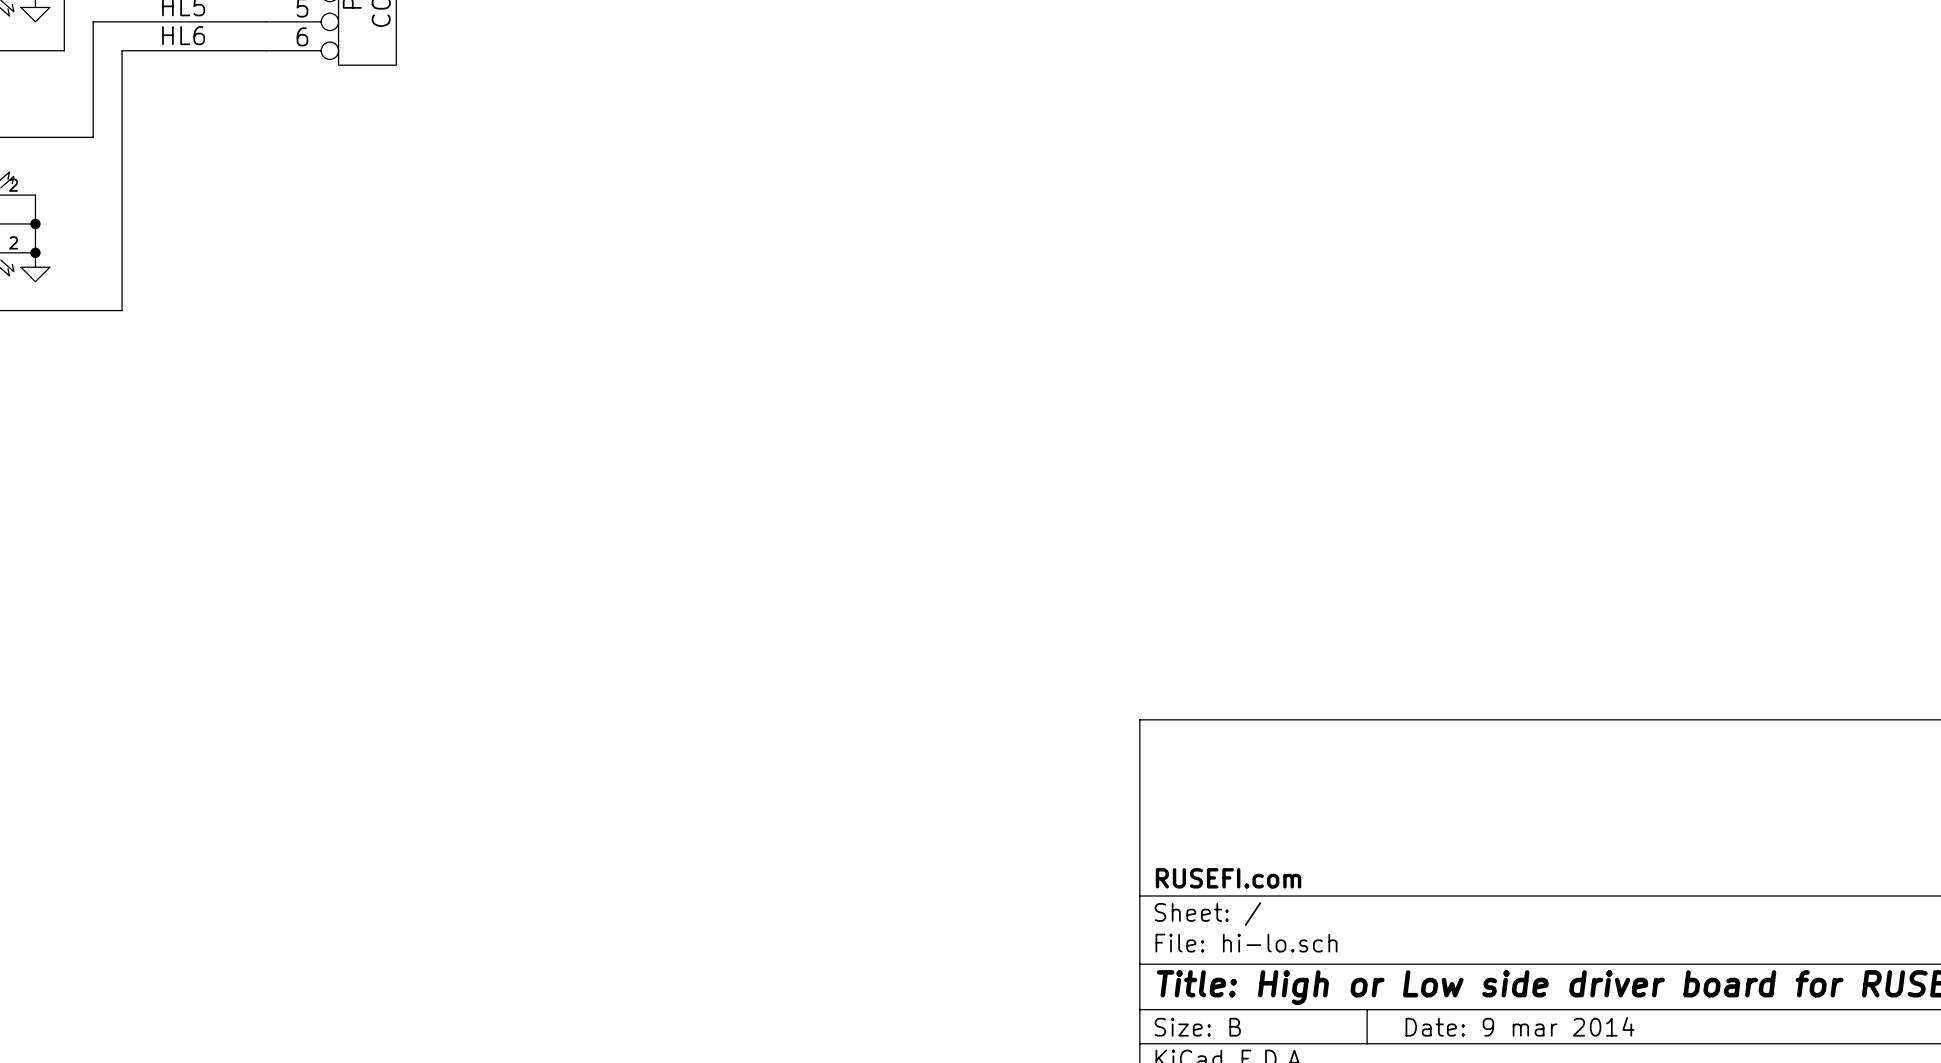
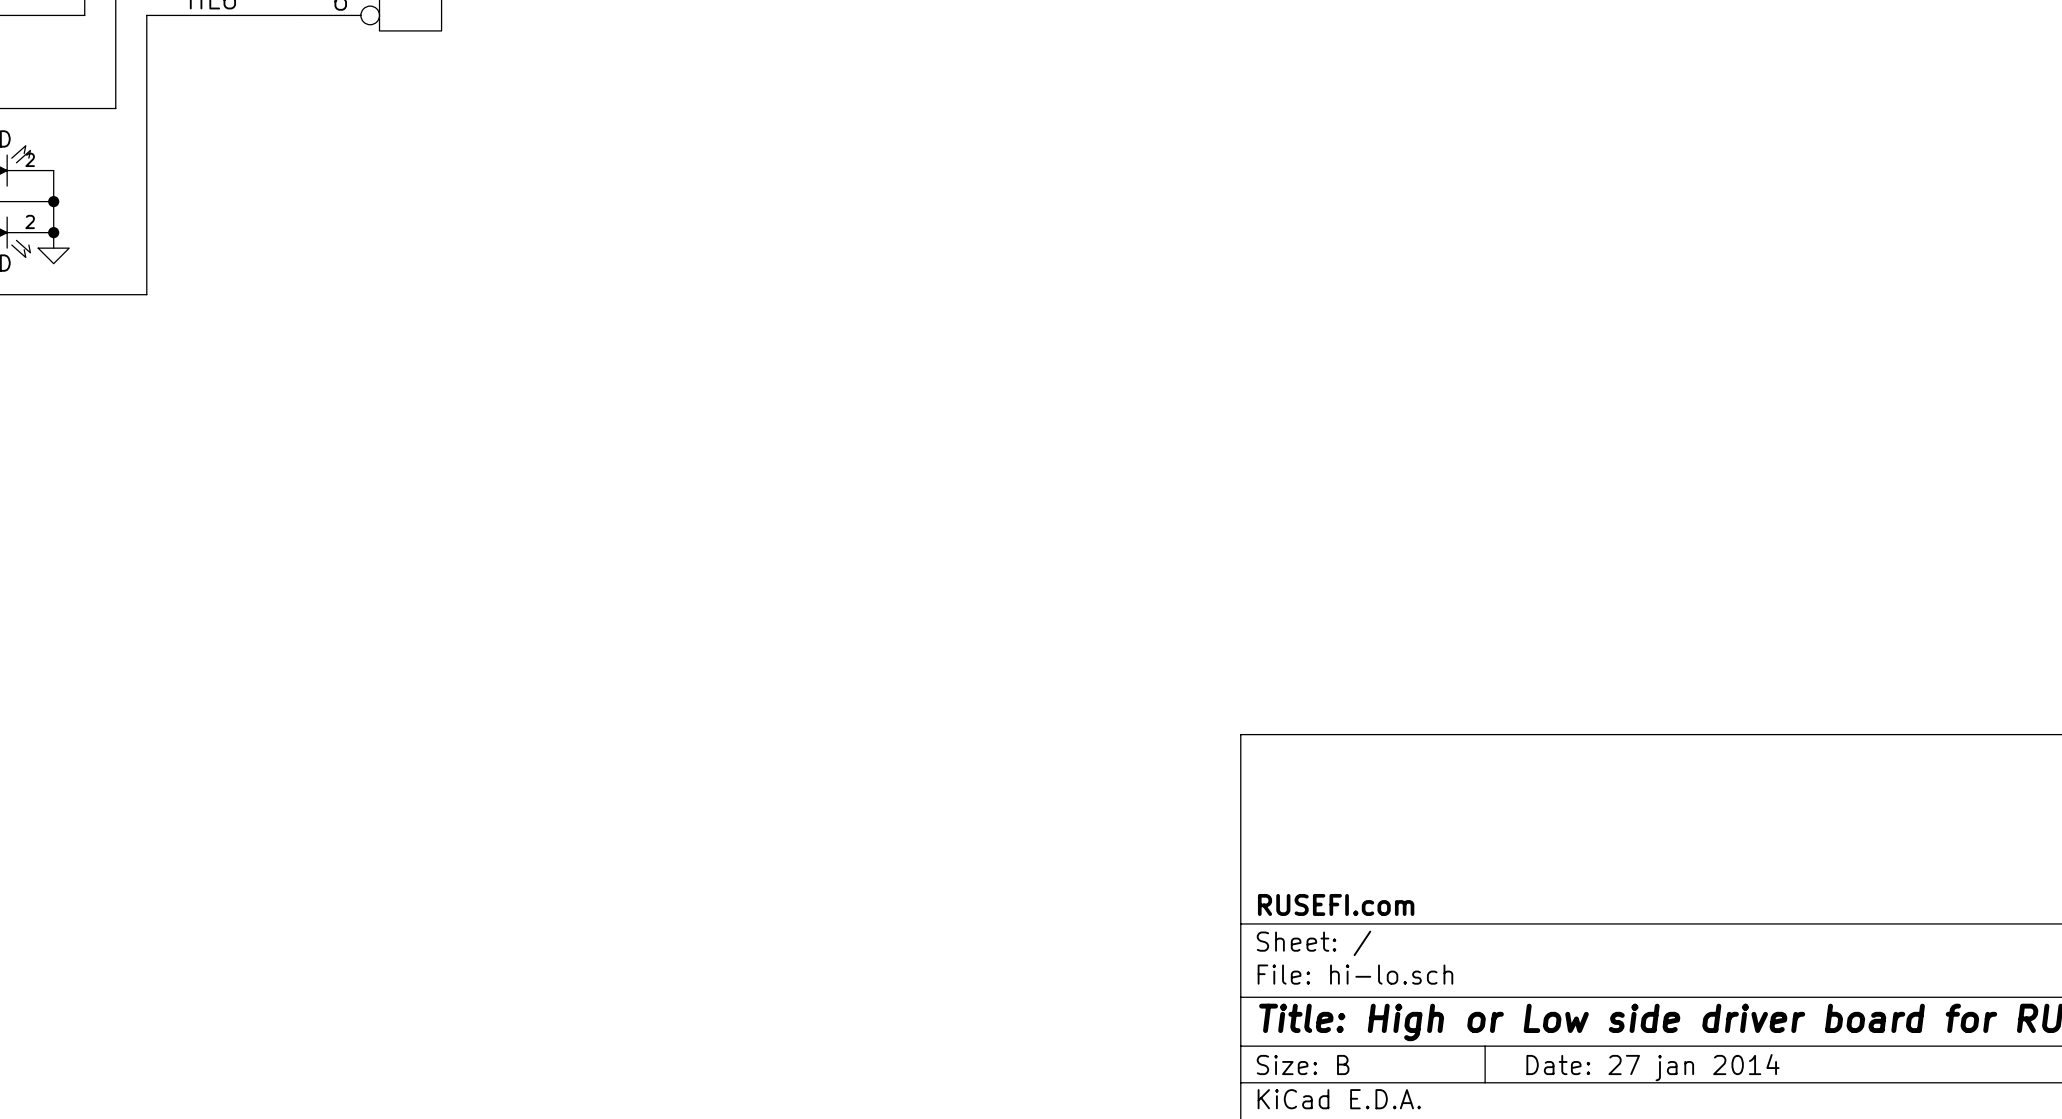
title block: Date: 9 mar 2014 (1520, 1026) -> Date: 27 jan 2014 (1653, 1067)

